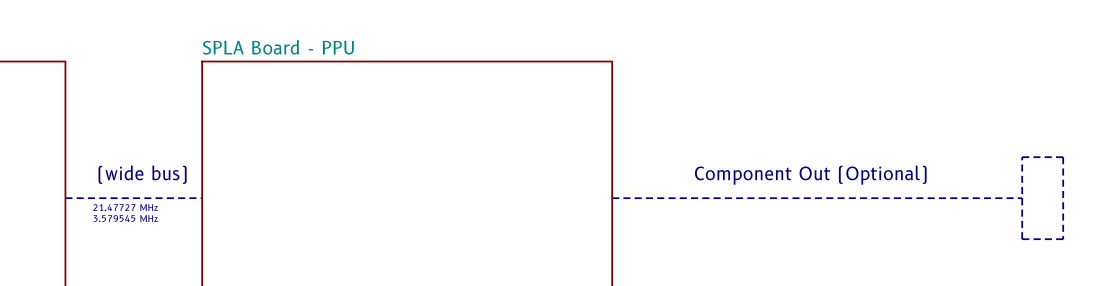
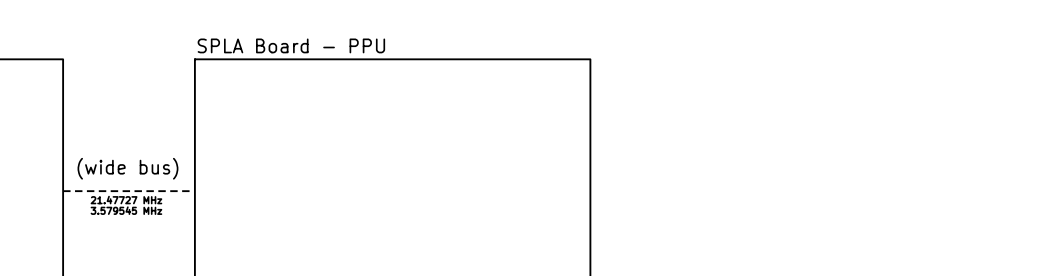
line: (1022, 157) (1063, 157) (1063, 239) (1022, 239) (1022, 157) -> none
text: Component Out (Optional) (810, 175) -> none
line: (612, 198) (1022, 198) -> none

